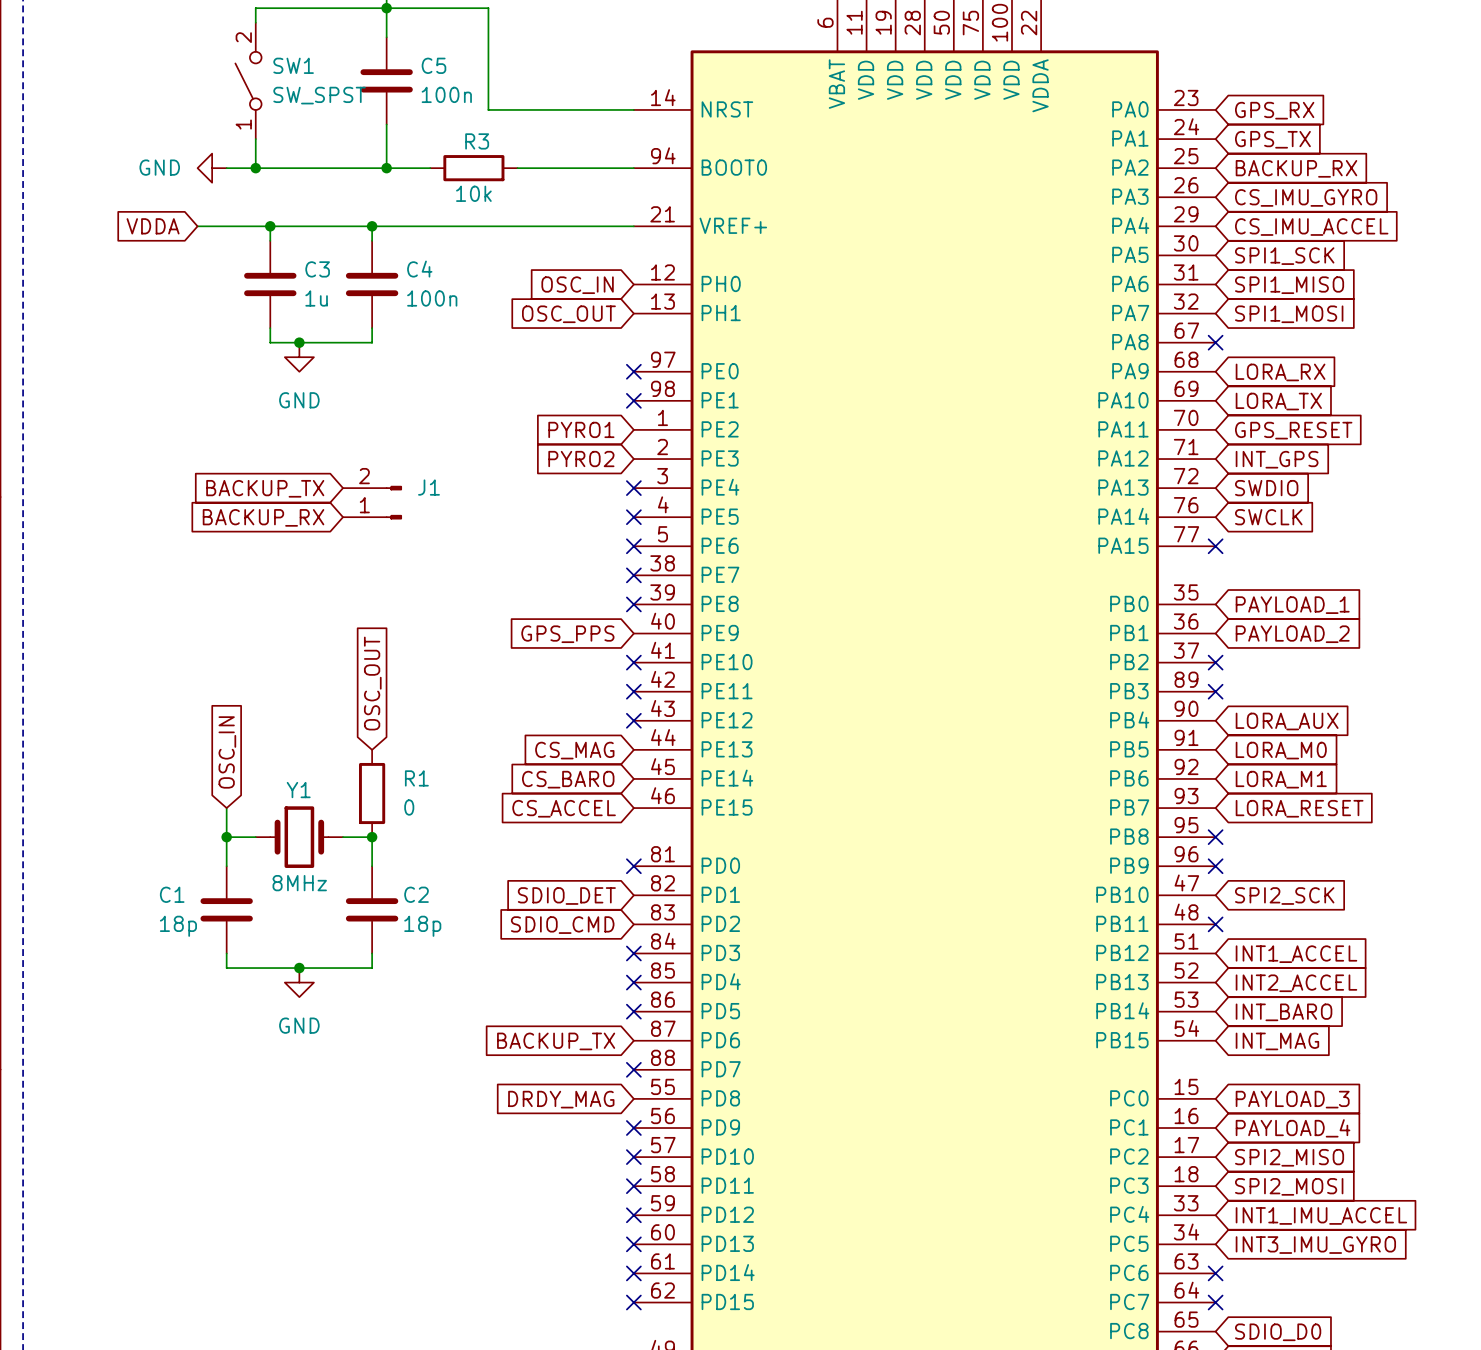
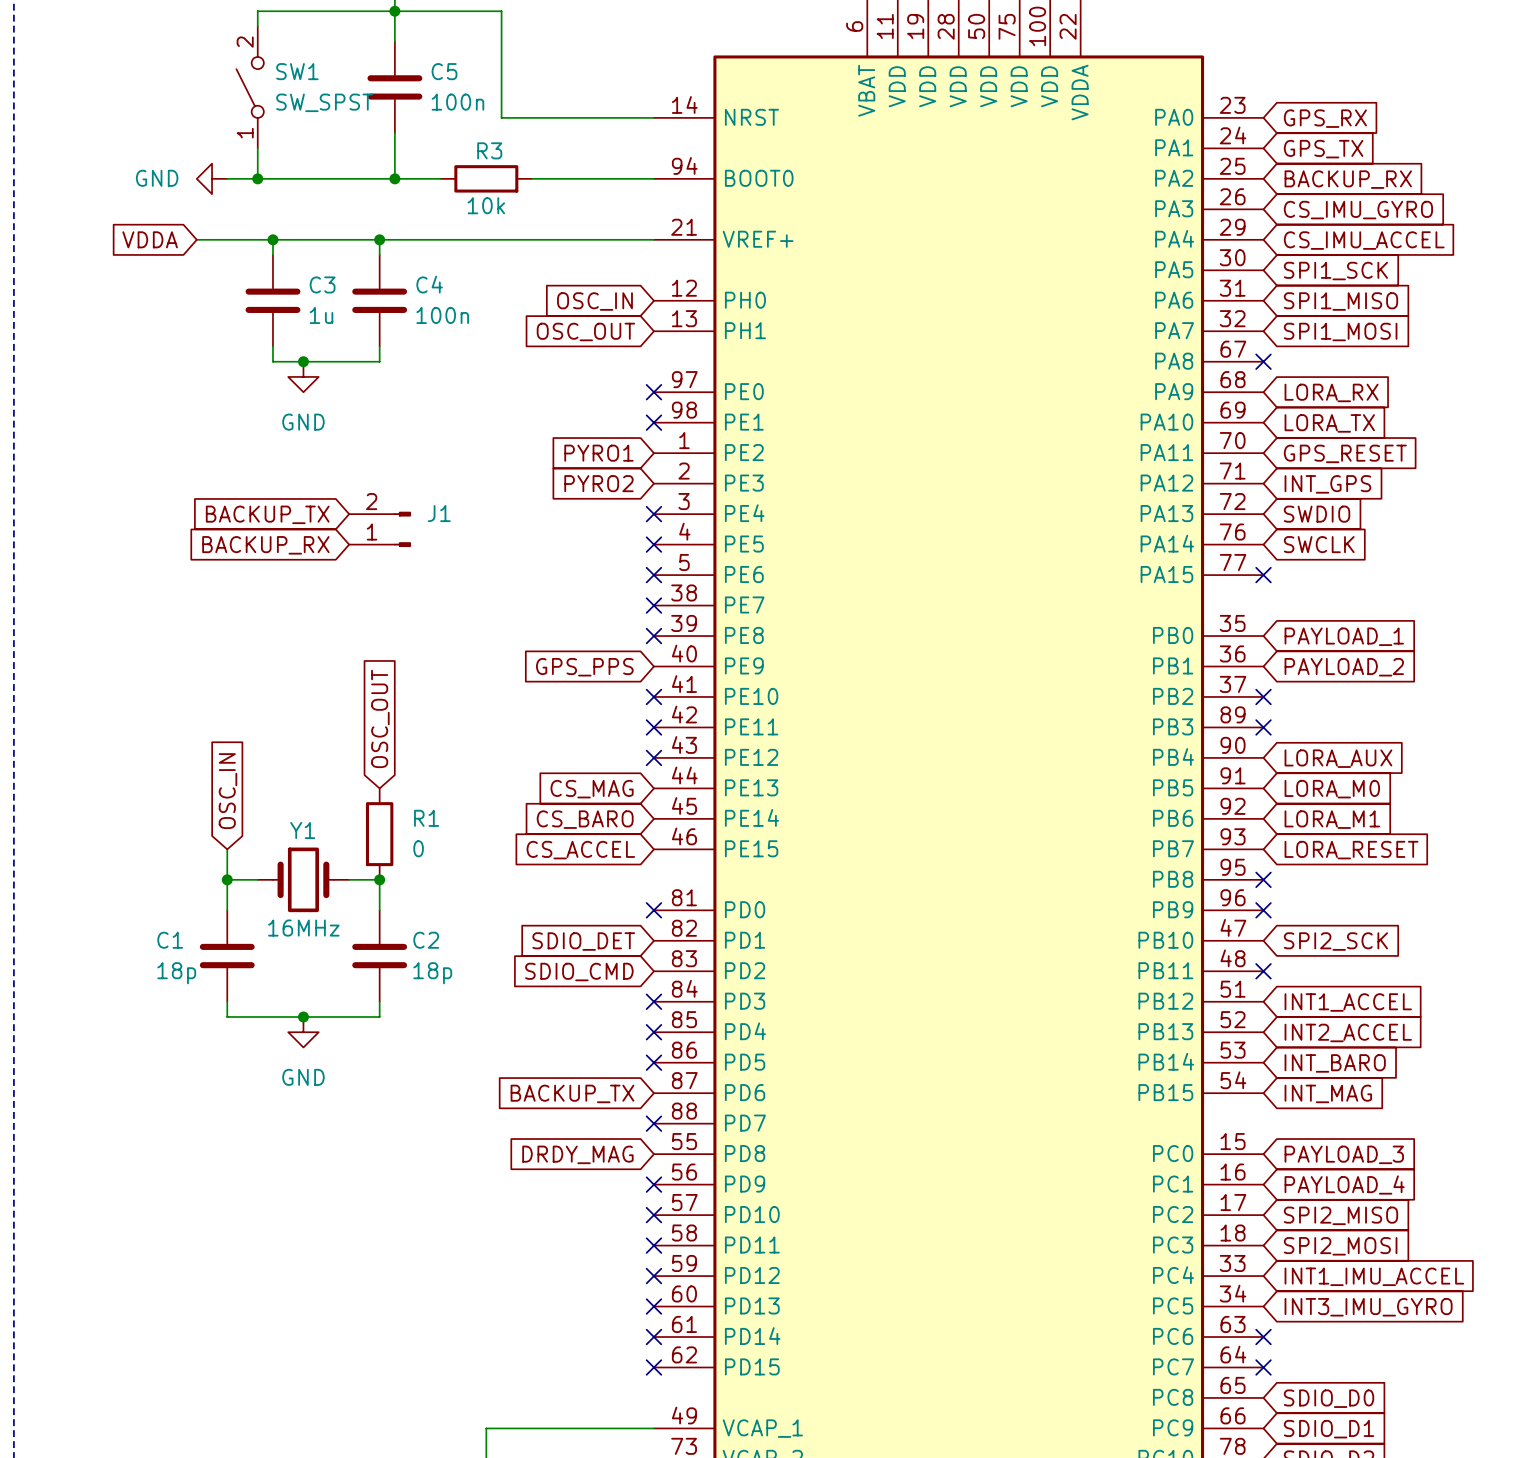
Y1 value: 8MHz (299, 883) -> 16MHz (303, 928)

